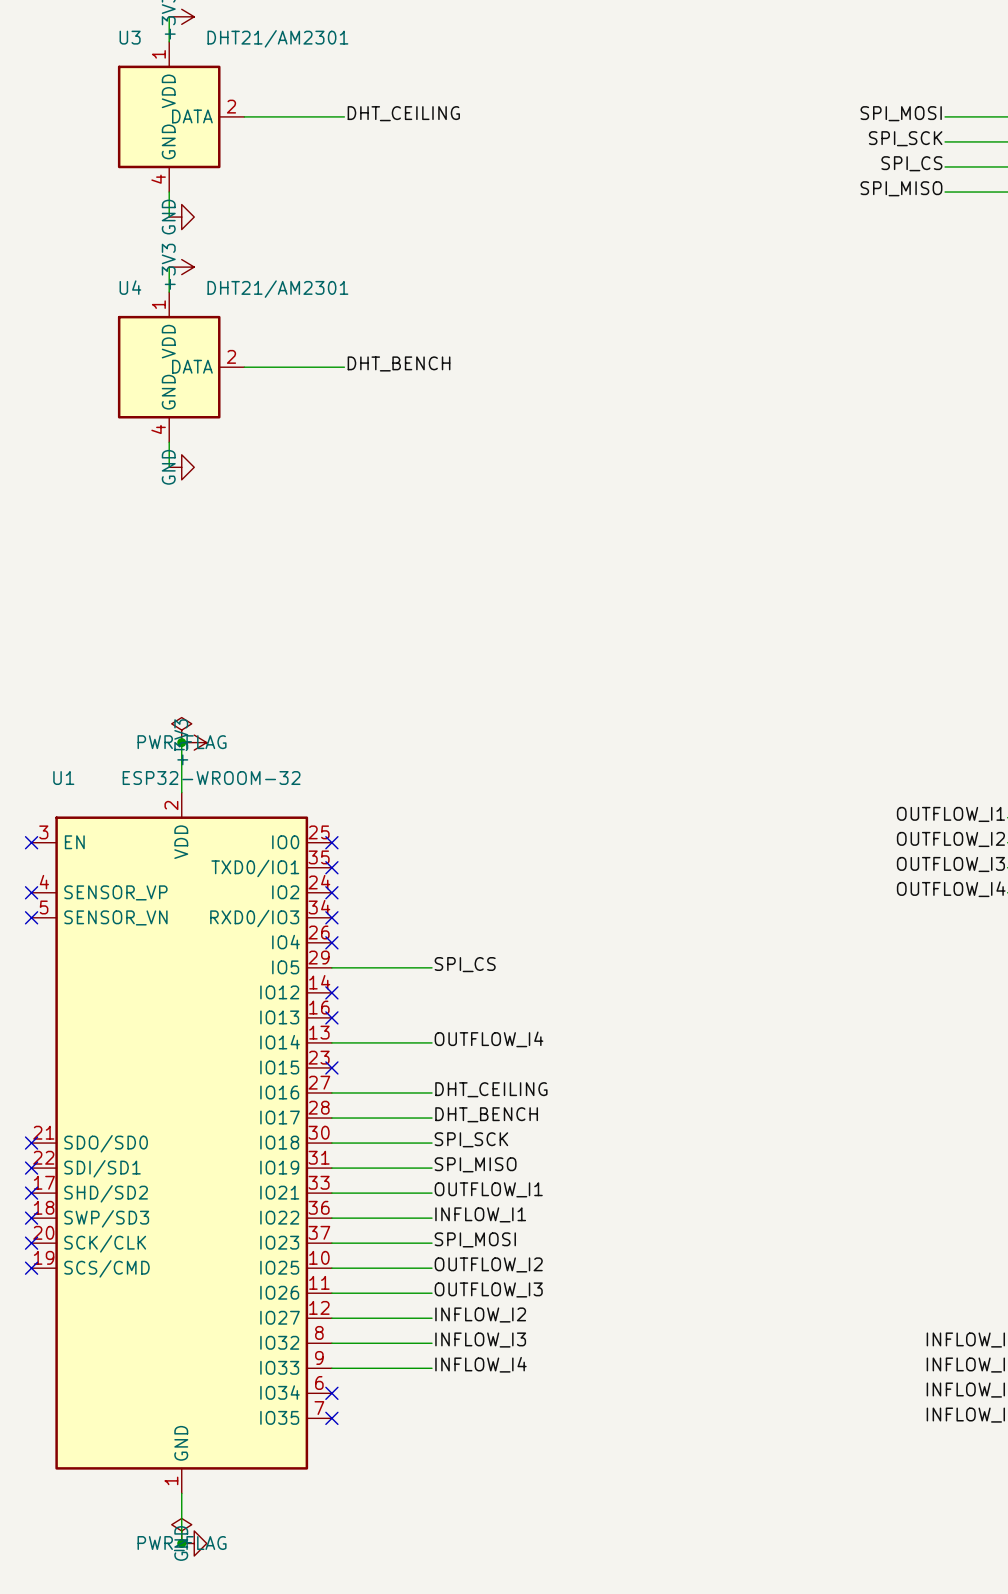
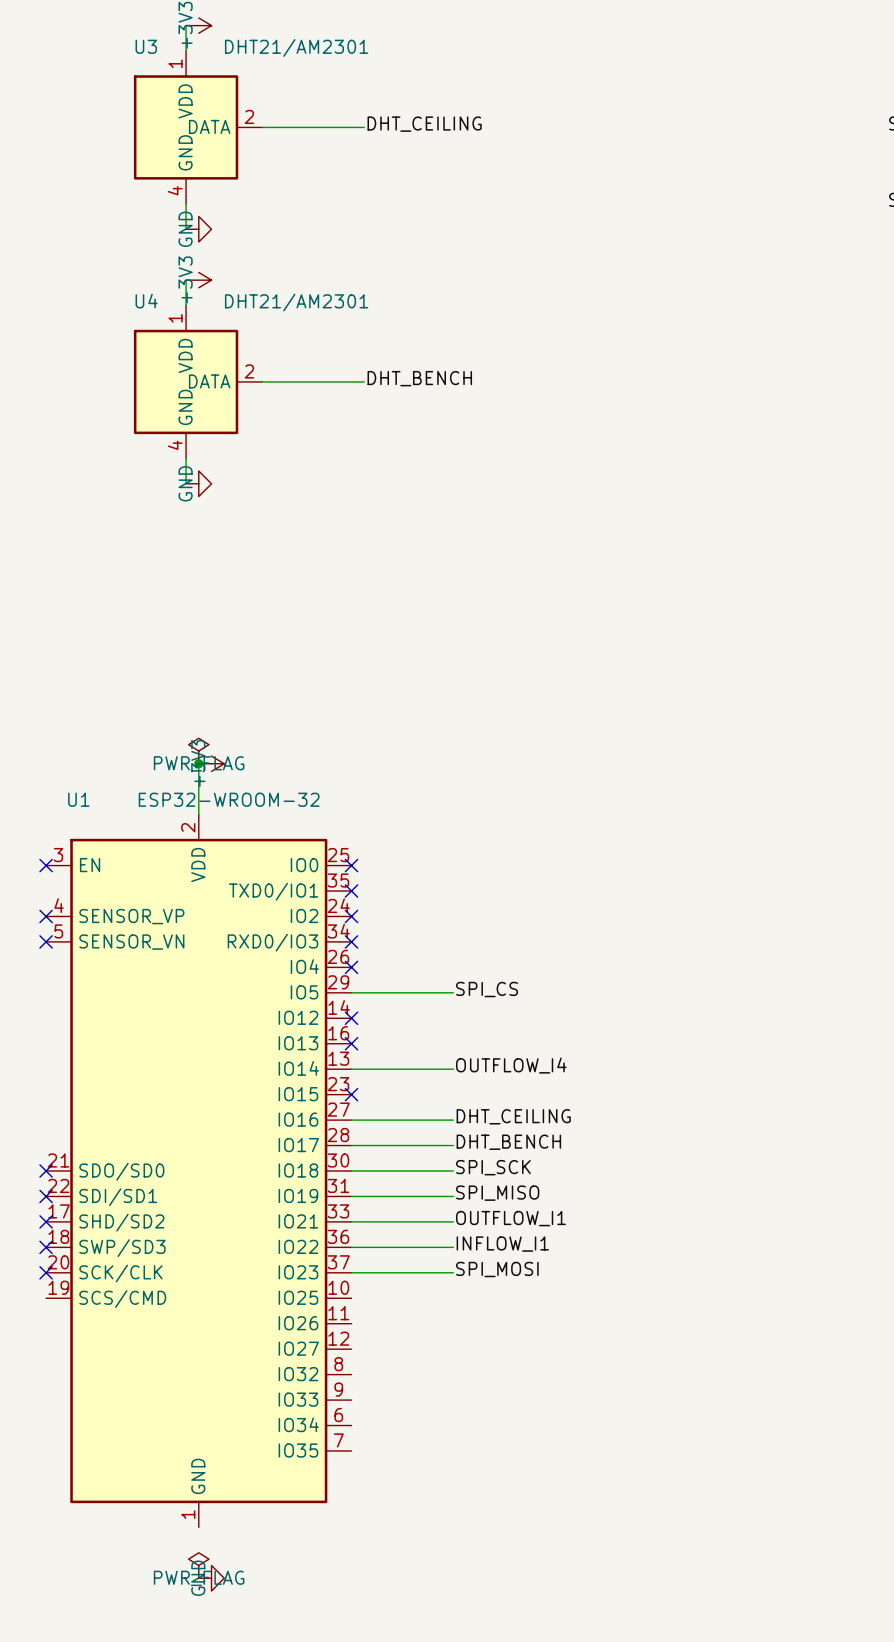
label: OUTFLOW_I2 (488, 1264) -> none
no-connect mark: (31, 1268) -> none
wire: (331, 1268) (432, 1268) -> none
label: OUTFLOW_I3 (488, 1289) -> none
wire: (331, 1293) (432, 1293) -> none
label: INFLOW_I2 (480, 1314) -> none
wire: (331, 1318) (432, 1318) -> none
label: INFLOW_I3 (480, 1340) -> none
wire: (331, 1343) (432, 1343) -> none
label: INFLOW_I4 (480, 1364) -> none
wire: (331, 1368) (432, 1368) -> none
no-connect mark: (331, 1393) -> none
no-connect mark: (331, 1418) -> none
wire: (181, 1493) (181, 1543) -> none
junction: (181, 1543) -> none

